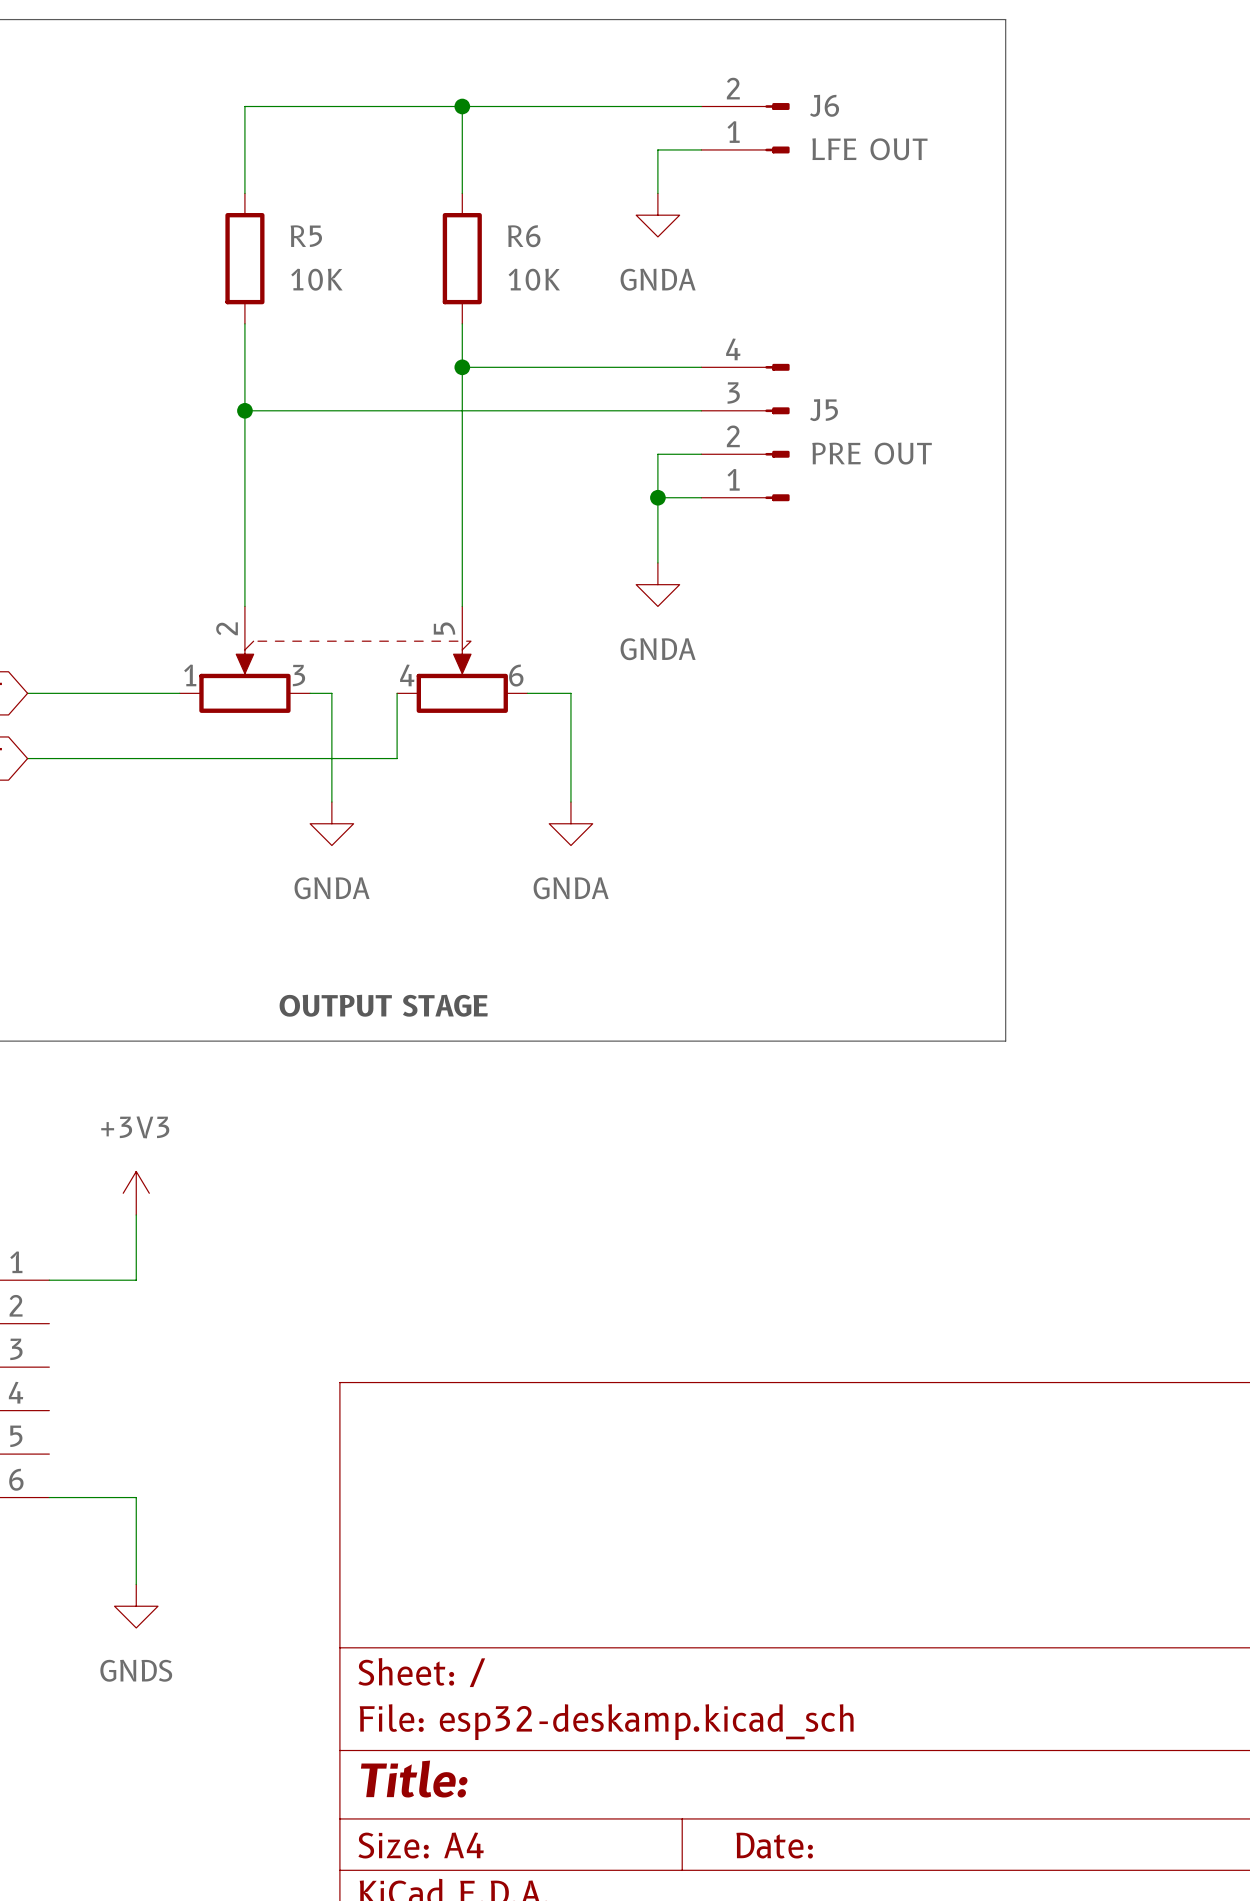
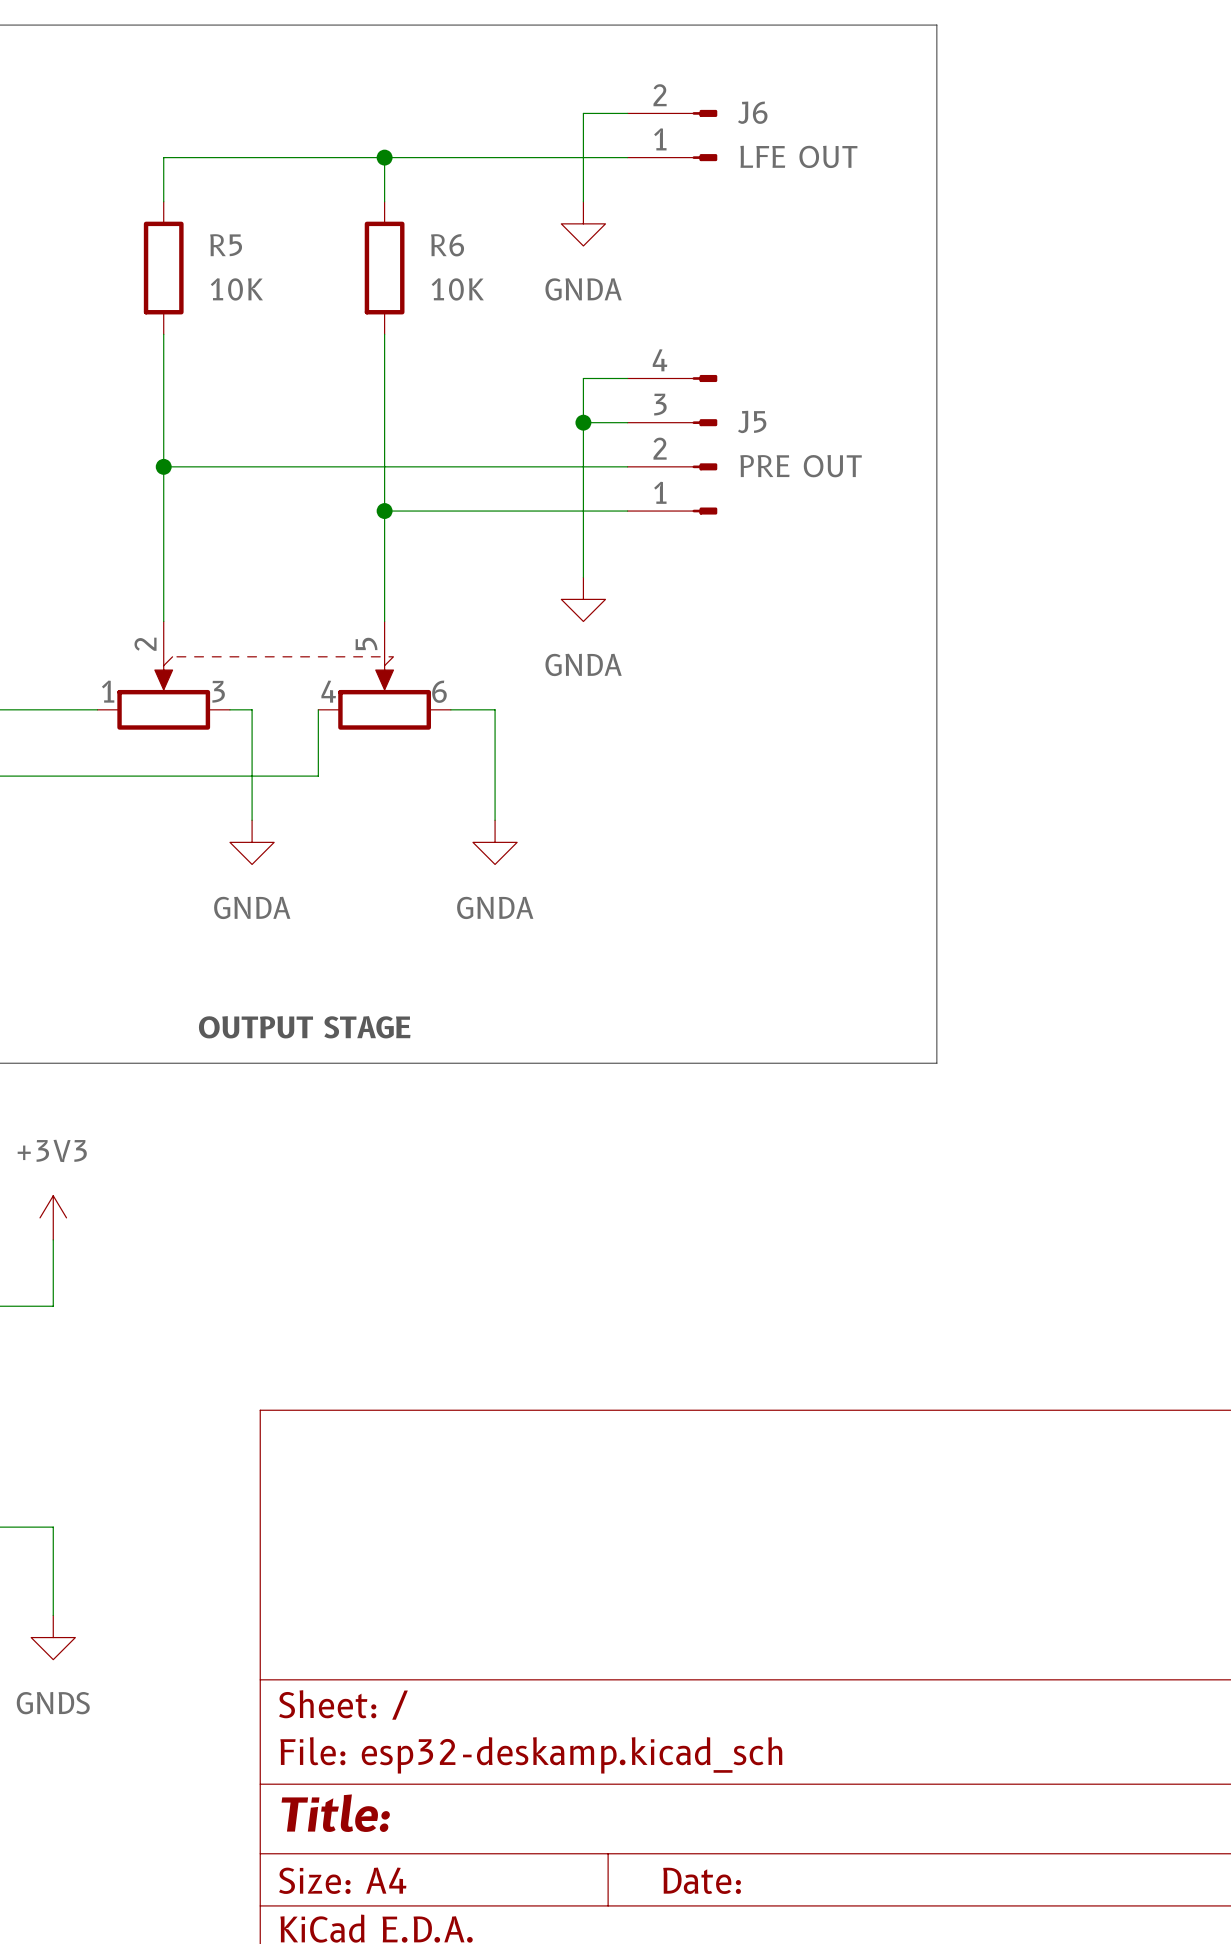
wire: (462, 106) (462, 149) -> none
junction position: (462, 106) -> (384, 157)
wire: (657, 106) (244, 106) (244, 149) -> (583, 113) (583, 157) (163, 157)
wire: (462, 367) (657, 367) -> (163, 466) (583, 466) (583, 378)
junction: (462, 367) -> none
wire: (244, 410) (657, 410) -> none
junction position: (244, 410) -> (163, 466)
wire: none -> (384, 511) (583, 511)
junction: none -> (384, 511)
junction position: (657, 497) -> (583, 422)

